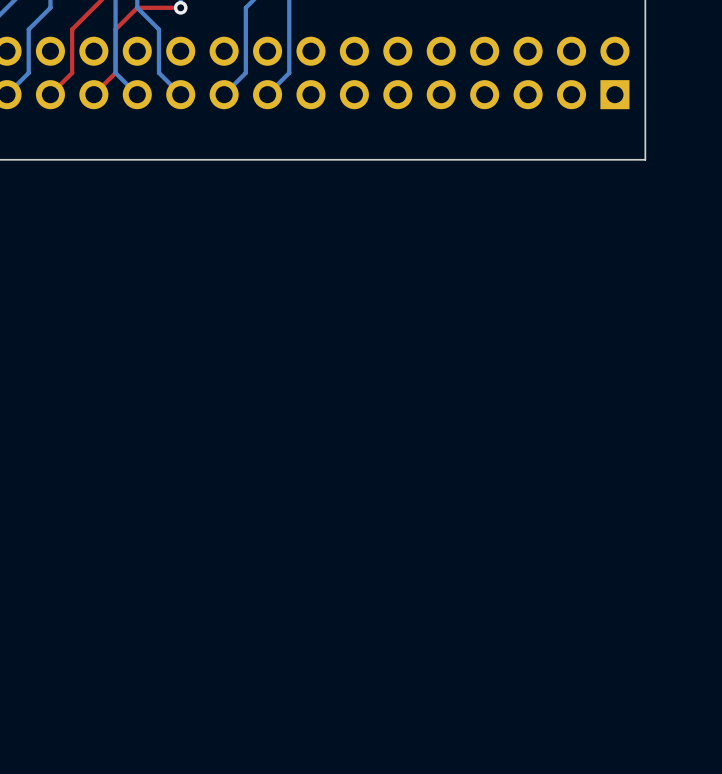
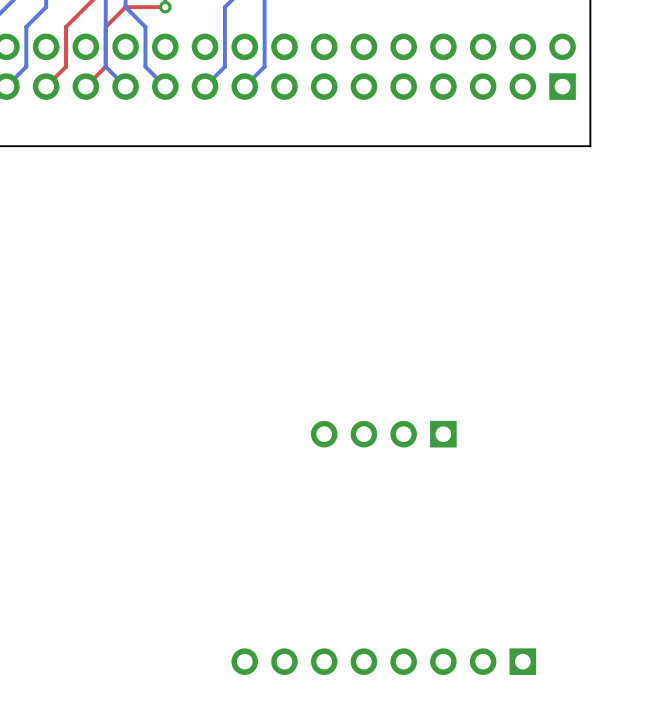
part: none -> (383, 434)
part: none -> (383, 661)

